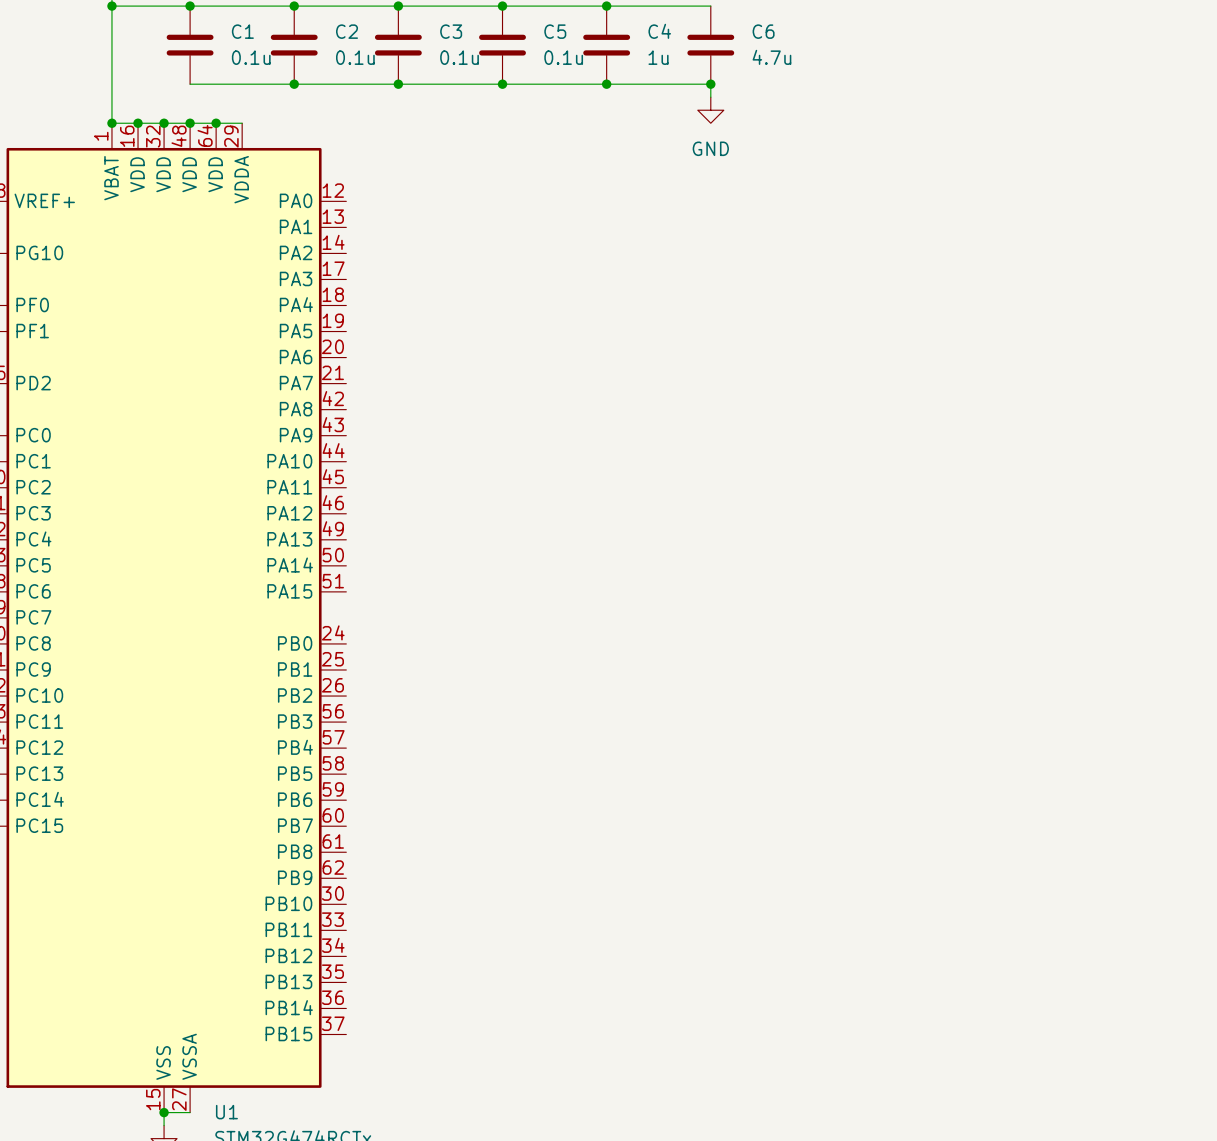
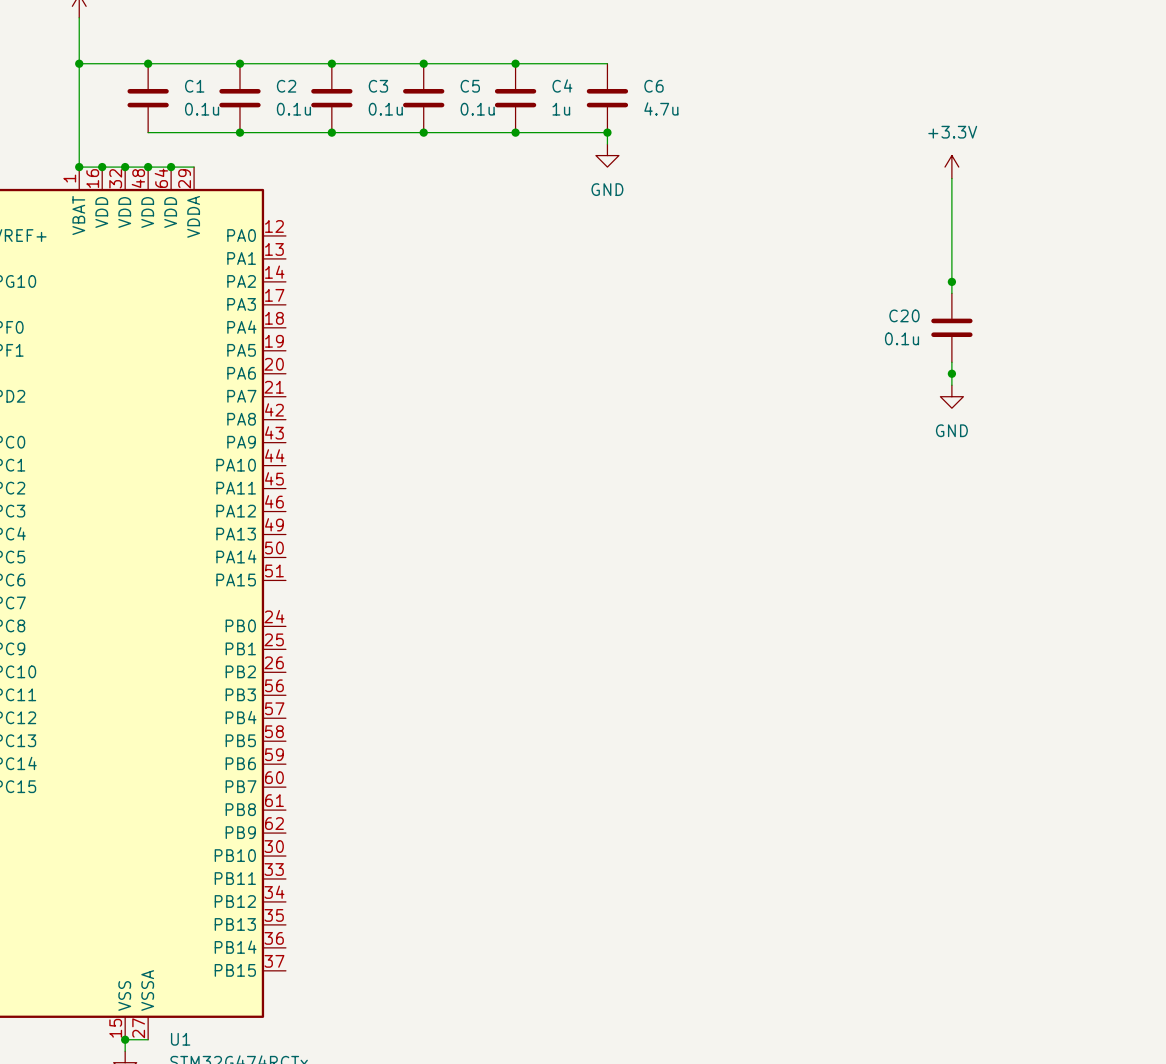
power symbol: none -> +3.3V (951, 167)
wire: none -> (951, 178) (951, 293)
junction: none -> (951, 281)
C20: none -> 0.1u (951, 327)
wire: none -> (951, 362) (951, 385)
junction: none -> (951, 373)
power symbol: none -> GND (951, 396)

